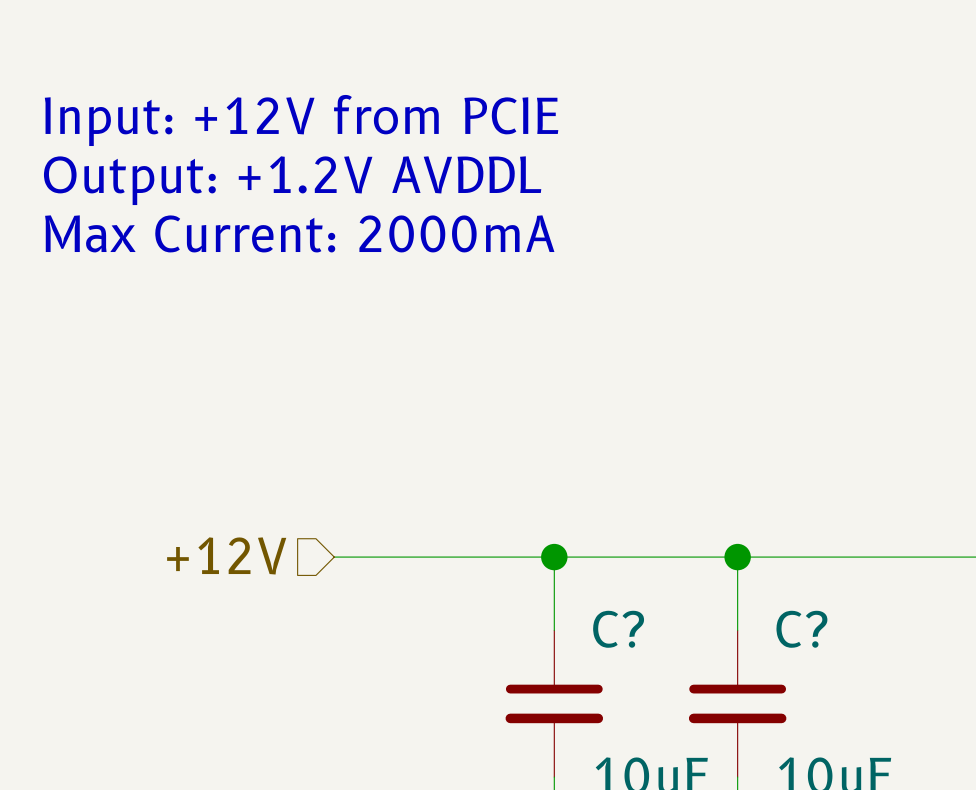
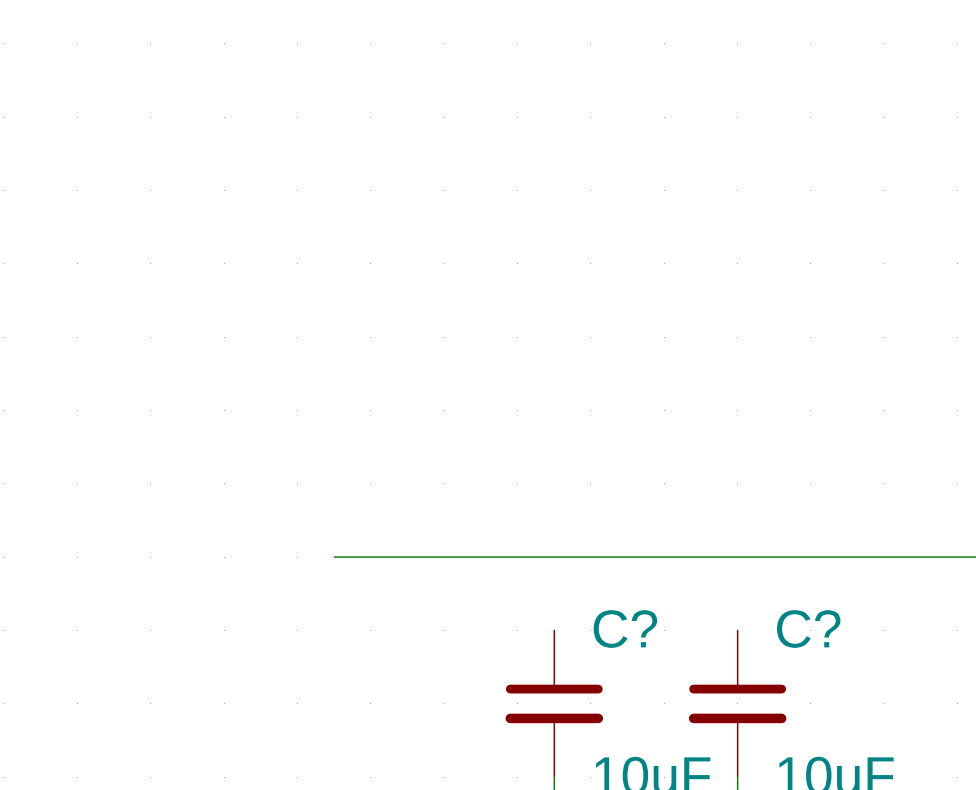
text: Input: +12V from PCIE (301, 120) -> none
text: Output: +1.2V AVDDL (292, 180) -> none
text: Max Current: 2000mA (299, 233) -> none
hierarchical label: +12V (226, 555) -> none
wire: (554, 557) (554, 630) -> none
junction: (554, 557) -> none
wire: (737, 557) (737, 630) -> none
junction: (737, 557) -> none

